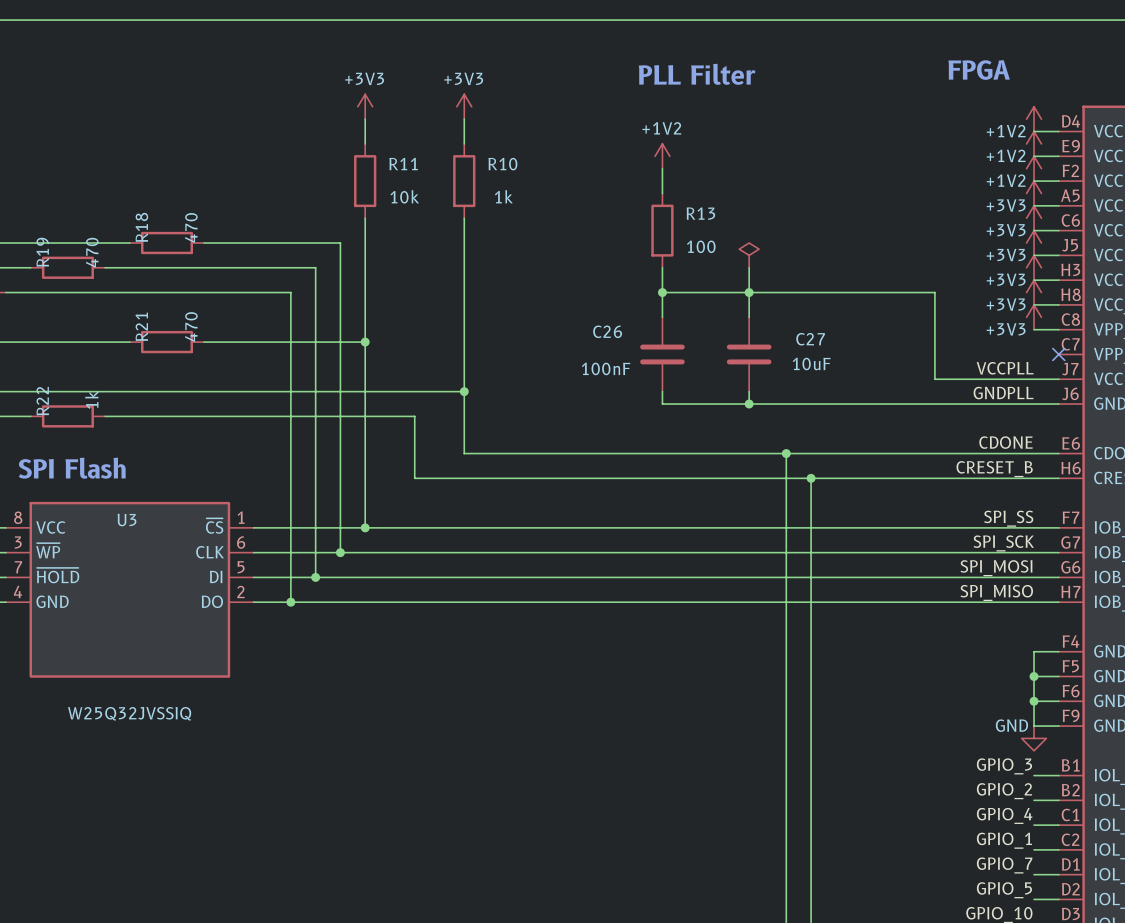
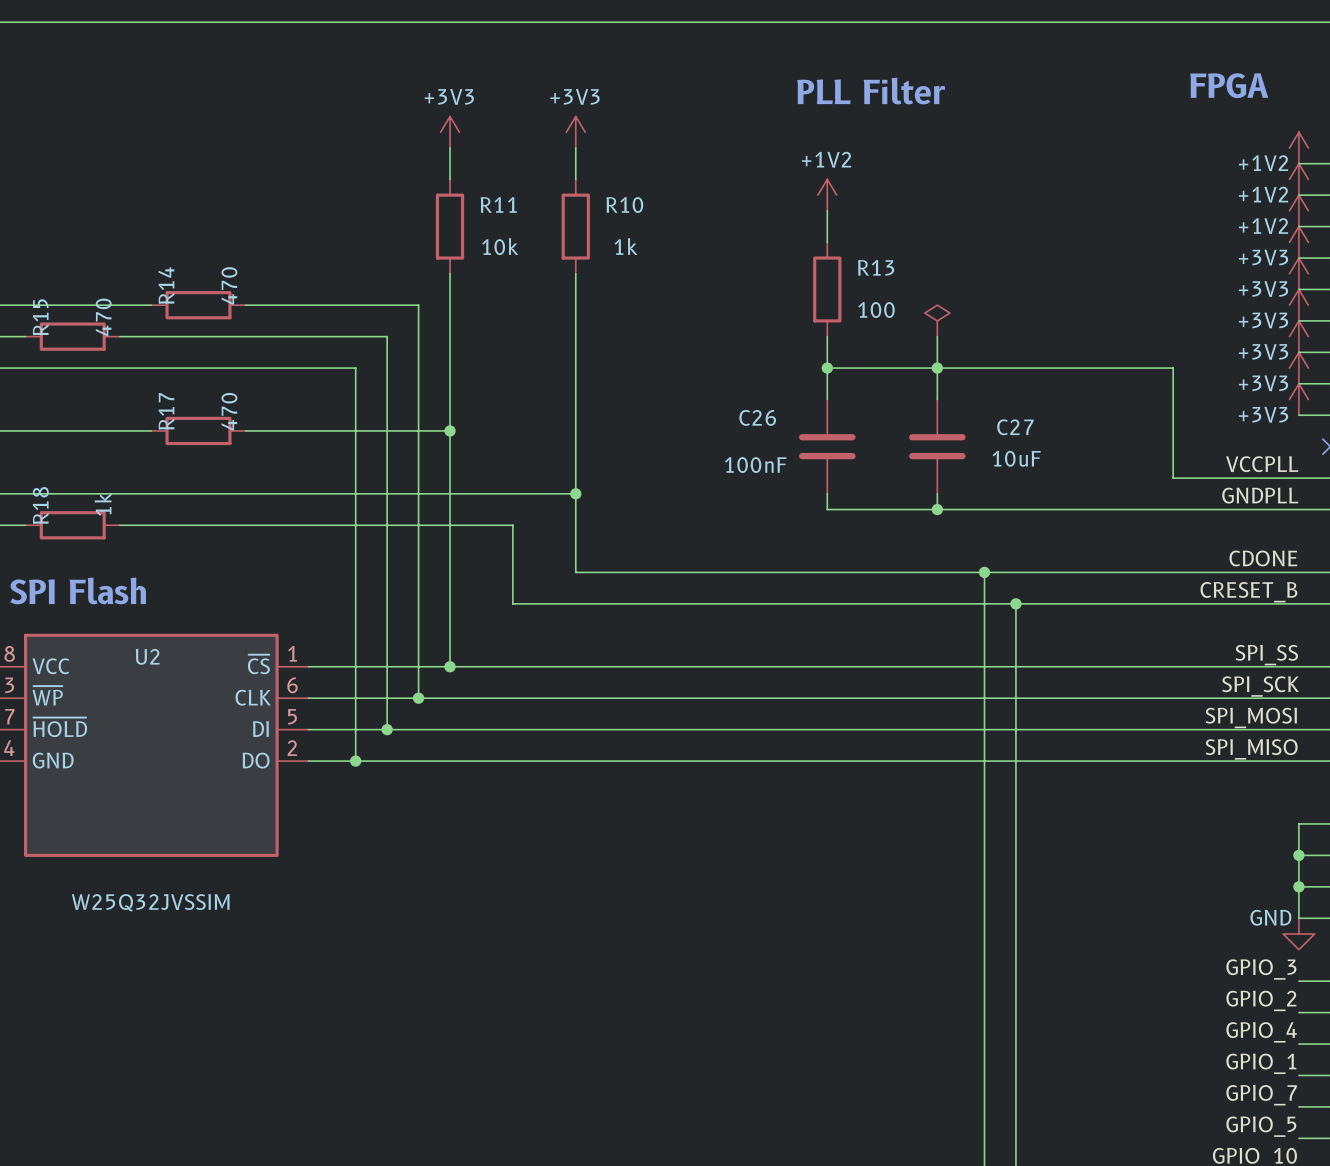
R18 name: R18 (141, 227) -> R14 (166, 285)
R19 name: R19 (42, 252) -> R15 (40, 317)
R21 name: R21 (141, 326) -> R17 (166, 411)
R22 name: R22 (42, 401) -> R18 (40, 505)
U3 name: U3 (127, 520) -> U2 (147, 656)
U3 value: W25Q32JVSSIQ (129, 713) -> W25Q32JVSSIM (150, 902)

